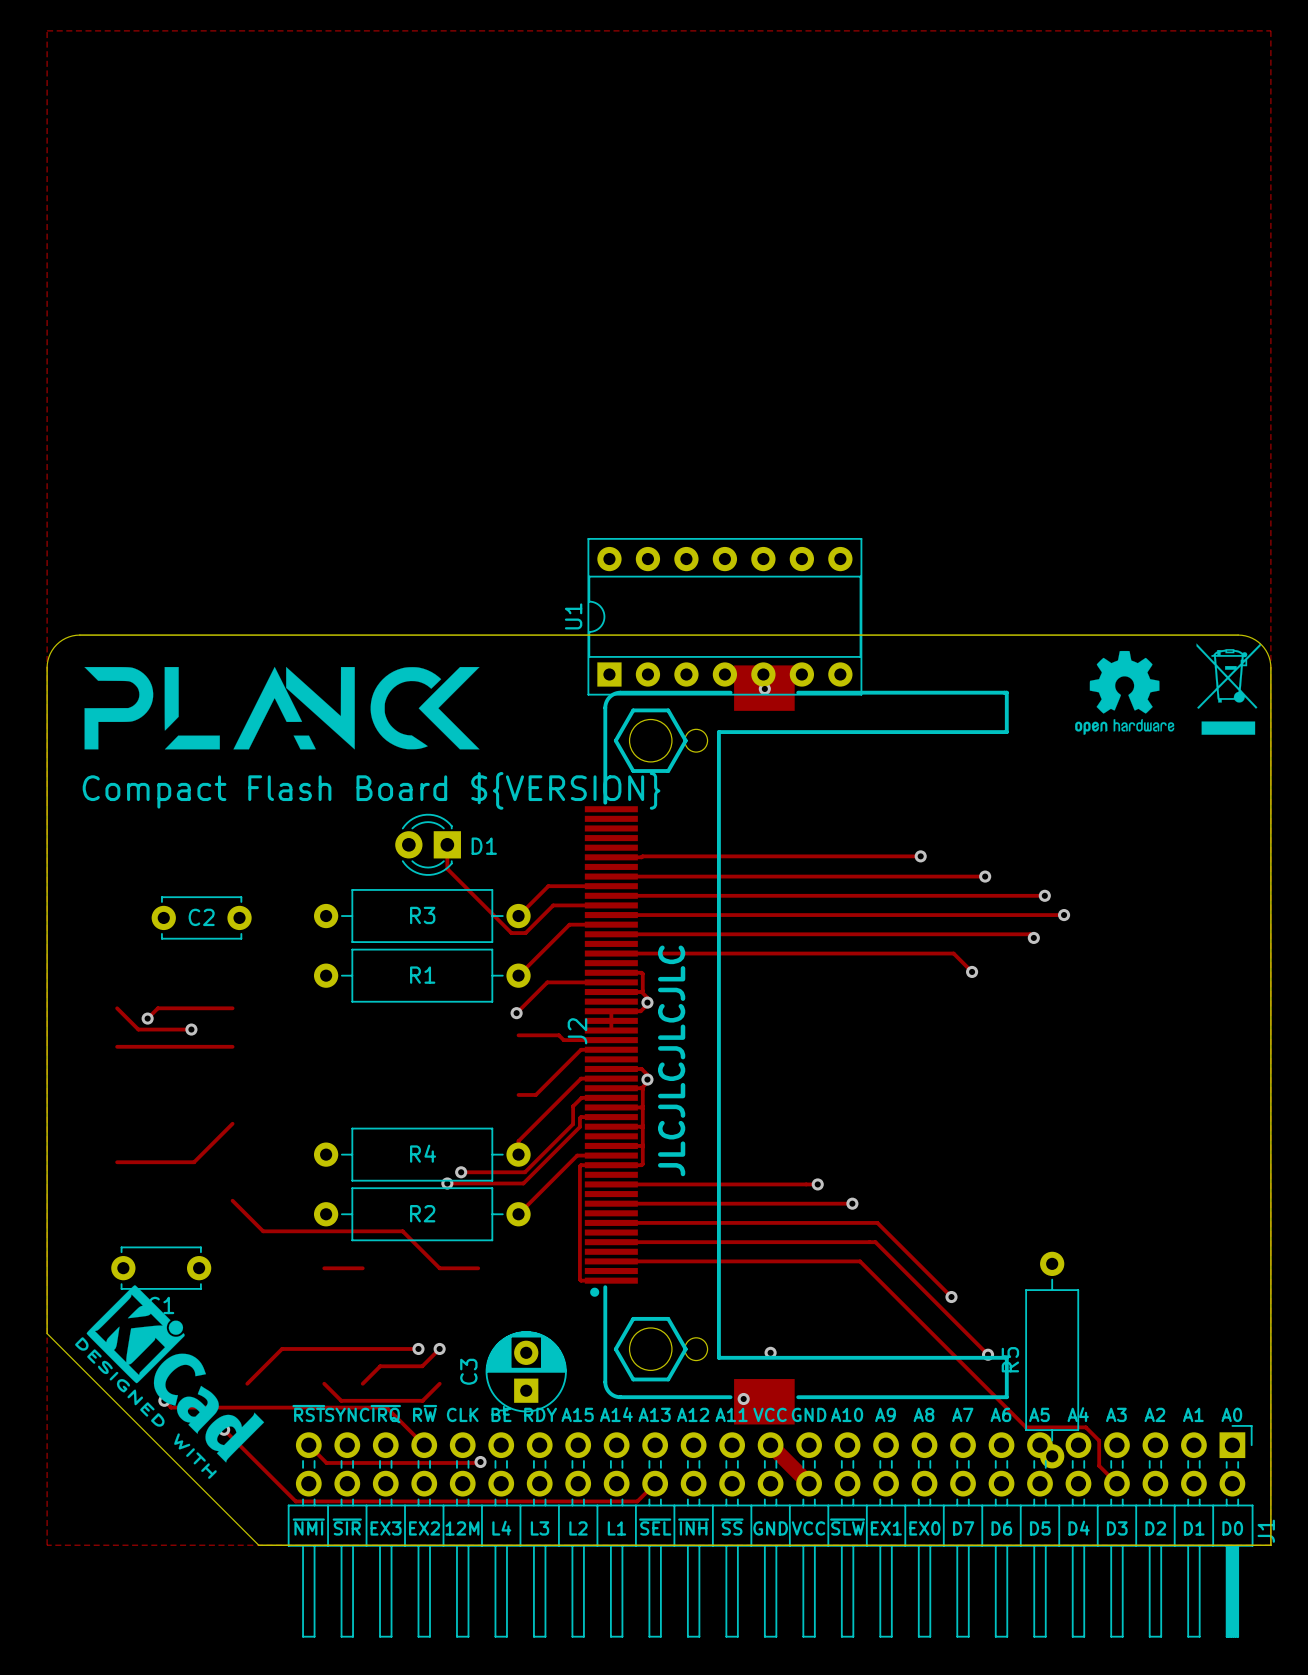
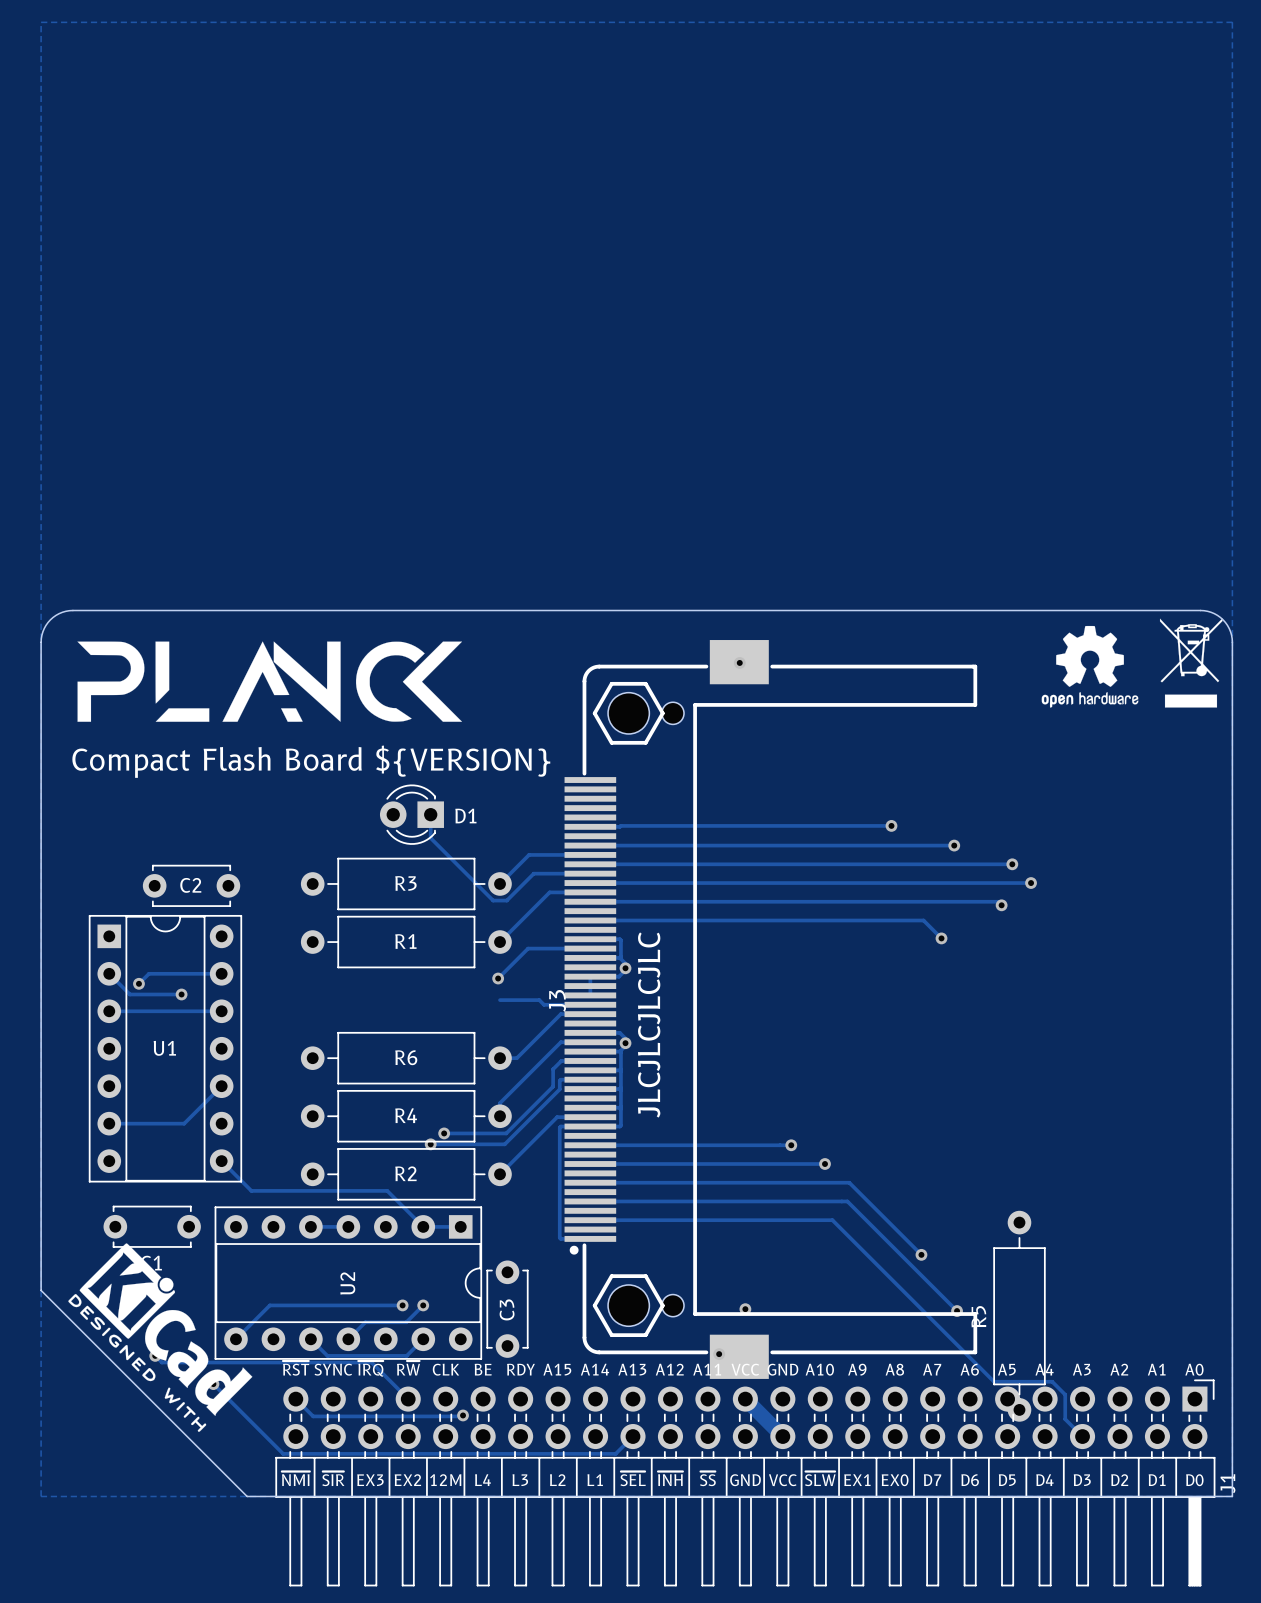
U1 name position: U1 (573, 616) -> U1 (164, 1048)
U1 rotation: 0° (724, 616) -> 90° clockwise (165, 1048)
U1 position: (724, 616) -> (165, 1048)
J2 name: J2 (577, 1031) -> J3 (557, 1000)
R6: none -> (406, 1058)
U2: none -> (348, 1283)
C3 footprint: [485, 1331, 567, 1416] -> [486, 1260, 529, 1358]
C3 name position: C3 (468, 1371) -> C3 (507, 1309)

